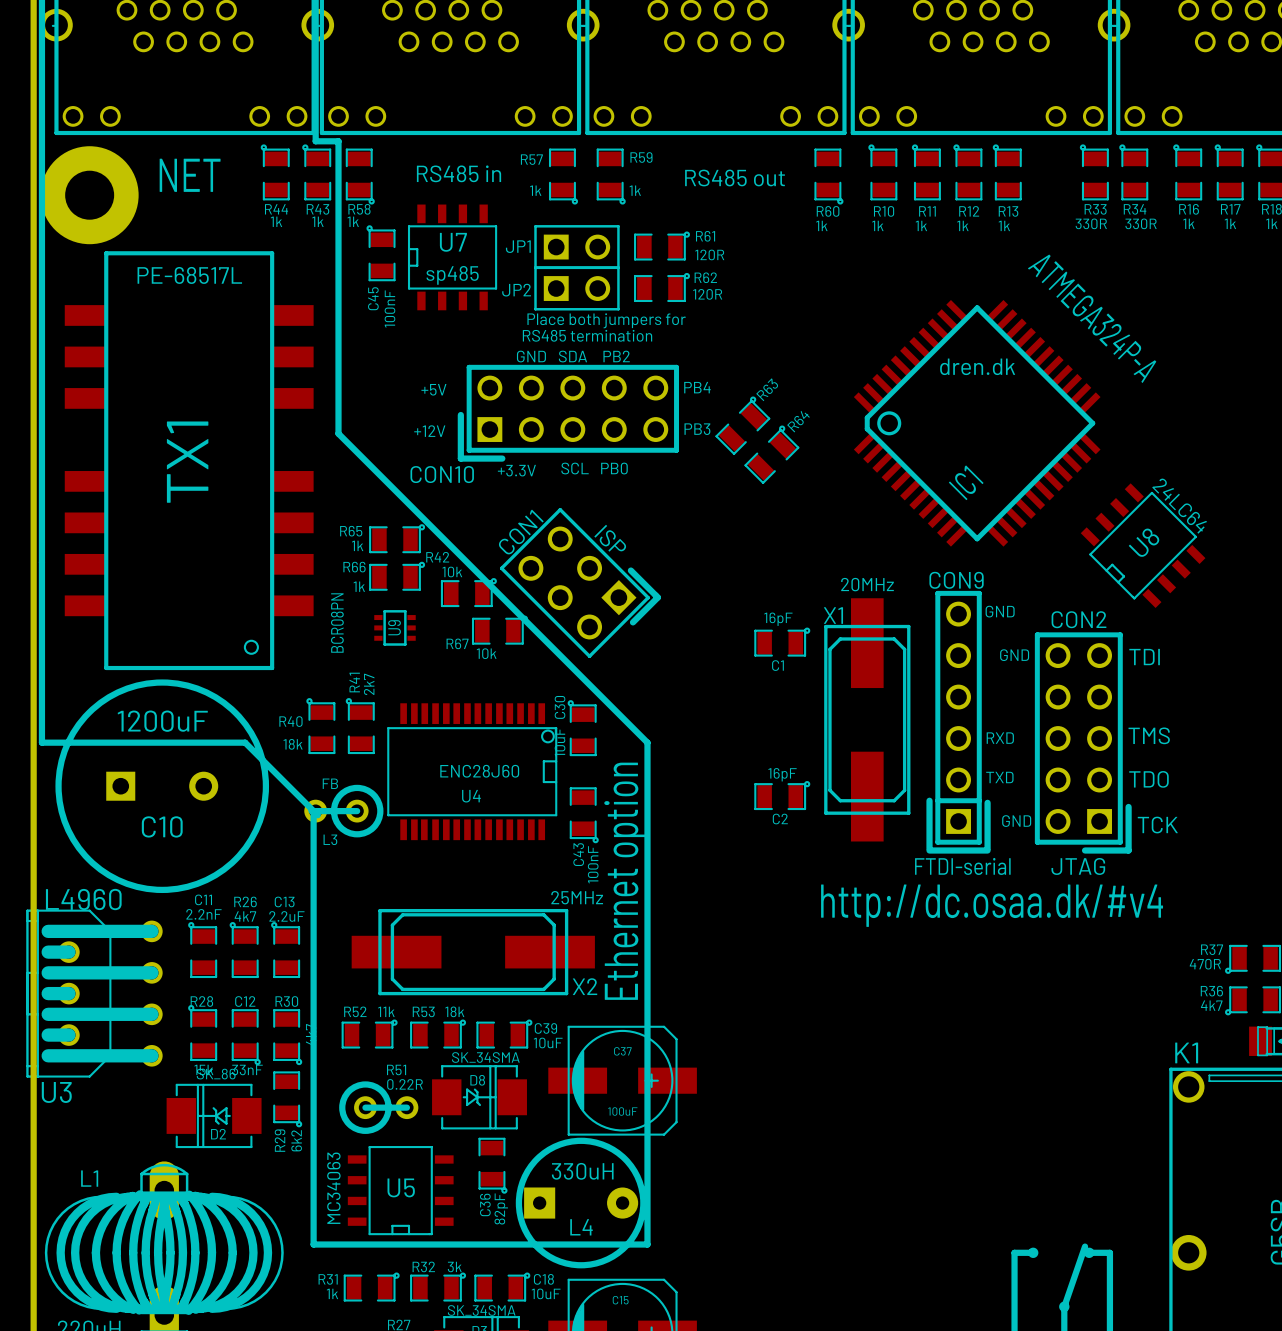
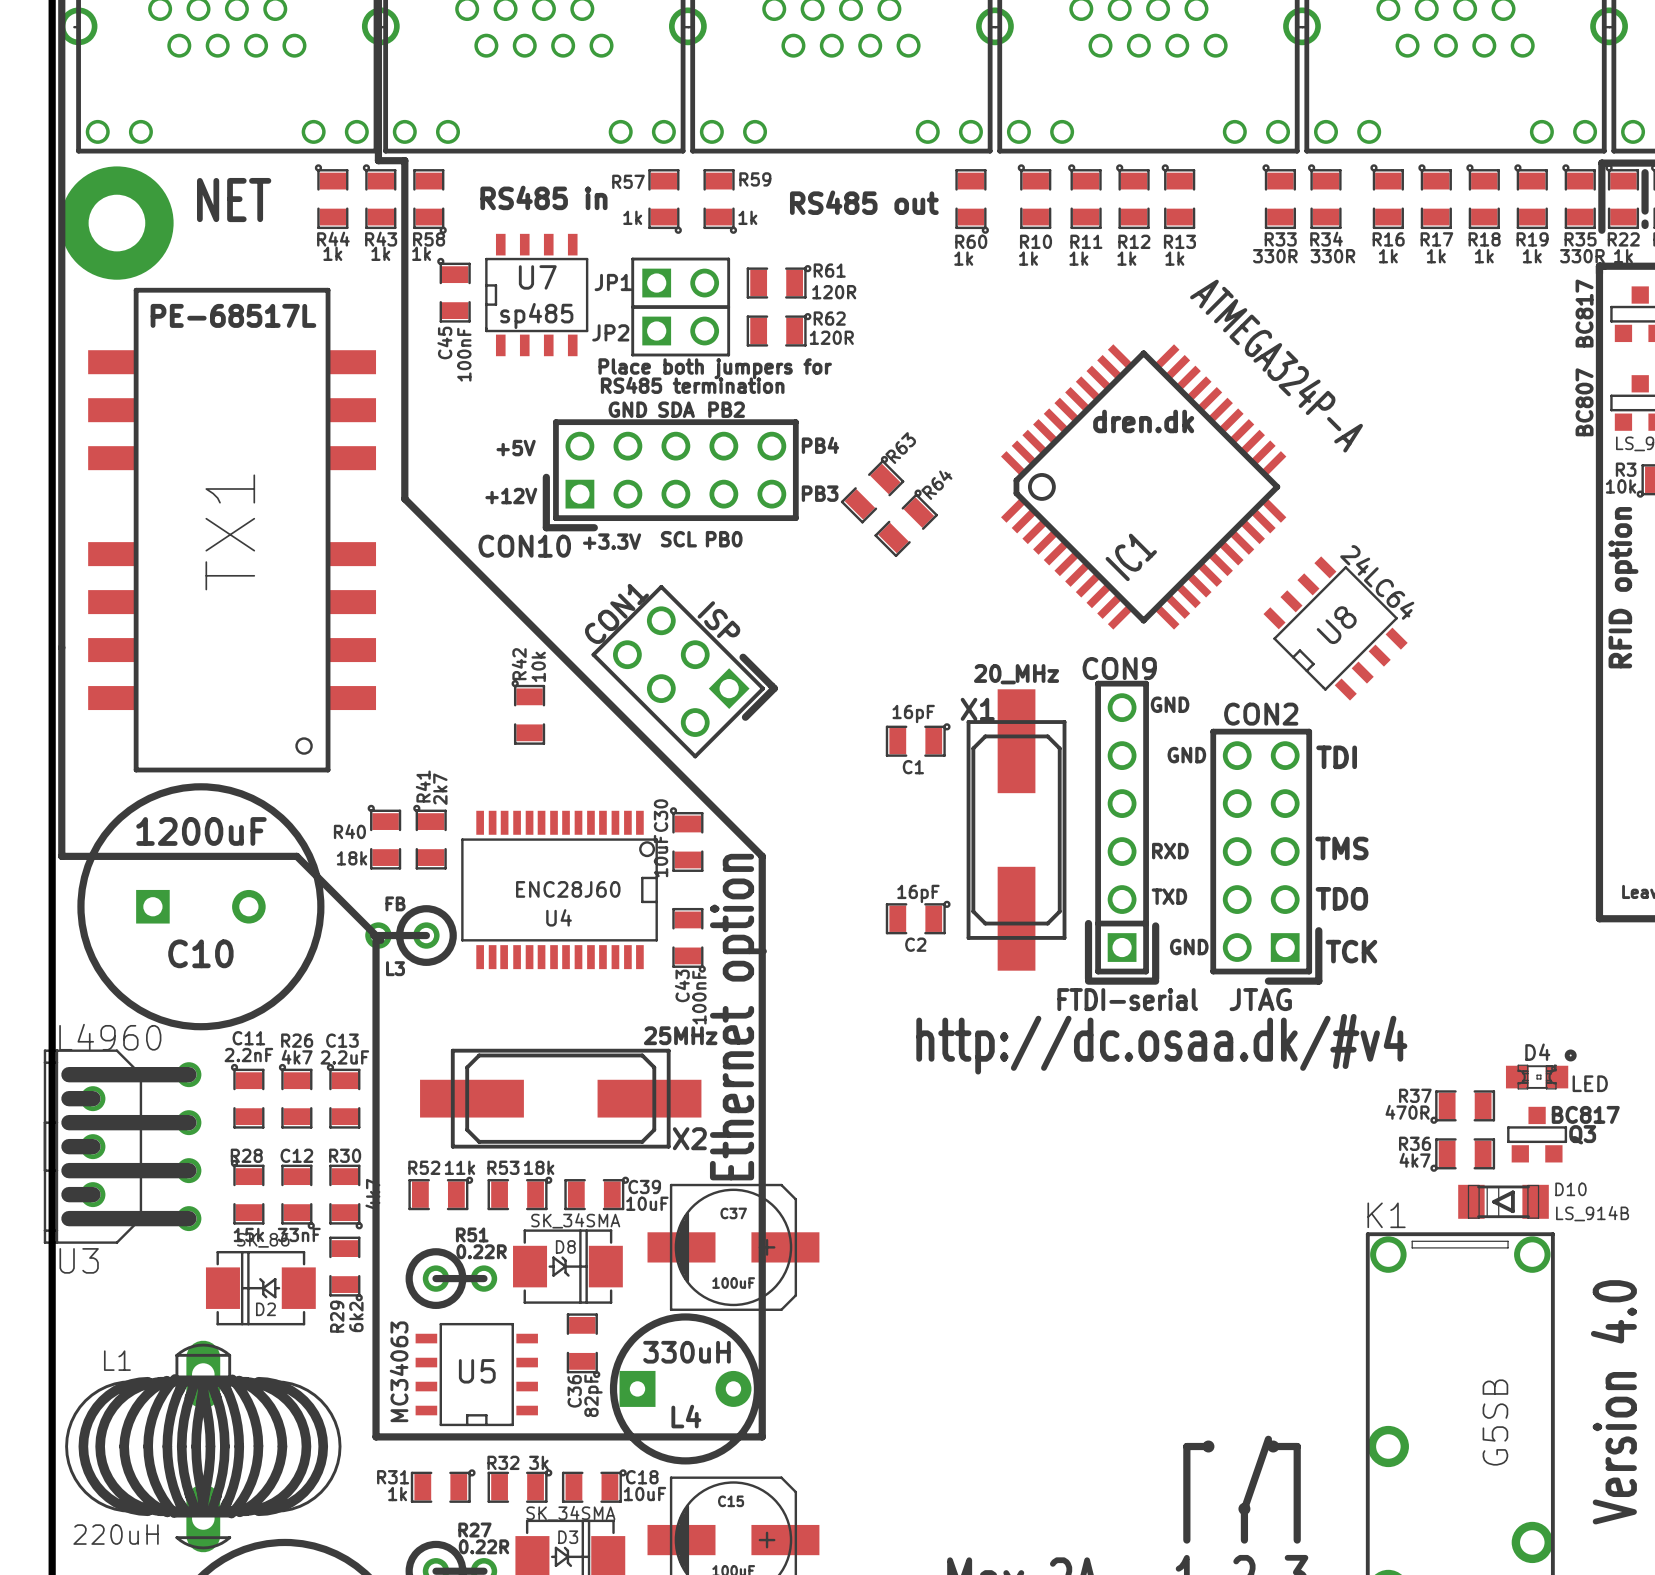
R65: 1k (397, 538) -> none
R66: 1k (397, 576) -> none
X1 value: 20MHz (867, 584) -> 20_MHz (1016, 674)
R42 rotation: 0° (468, 592) -> 90° counterclockwise (528, 712)
R42 position: (468, 592) -> (528, 712)
U9: BCR08PN (394, 627) -> none
R67: 10k (499, 630) -> none

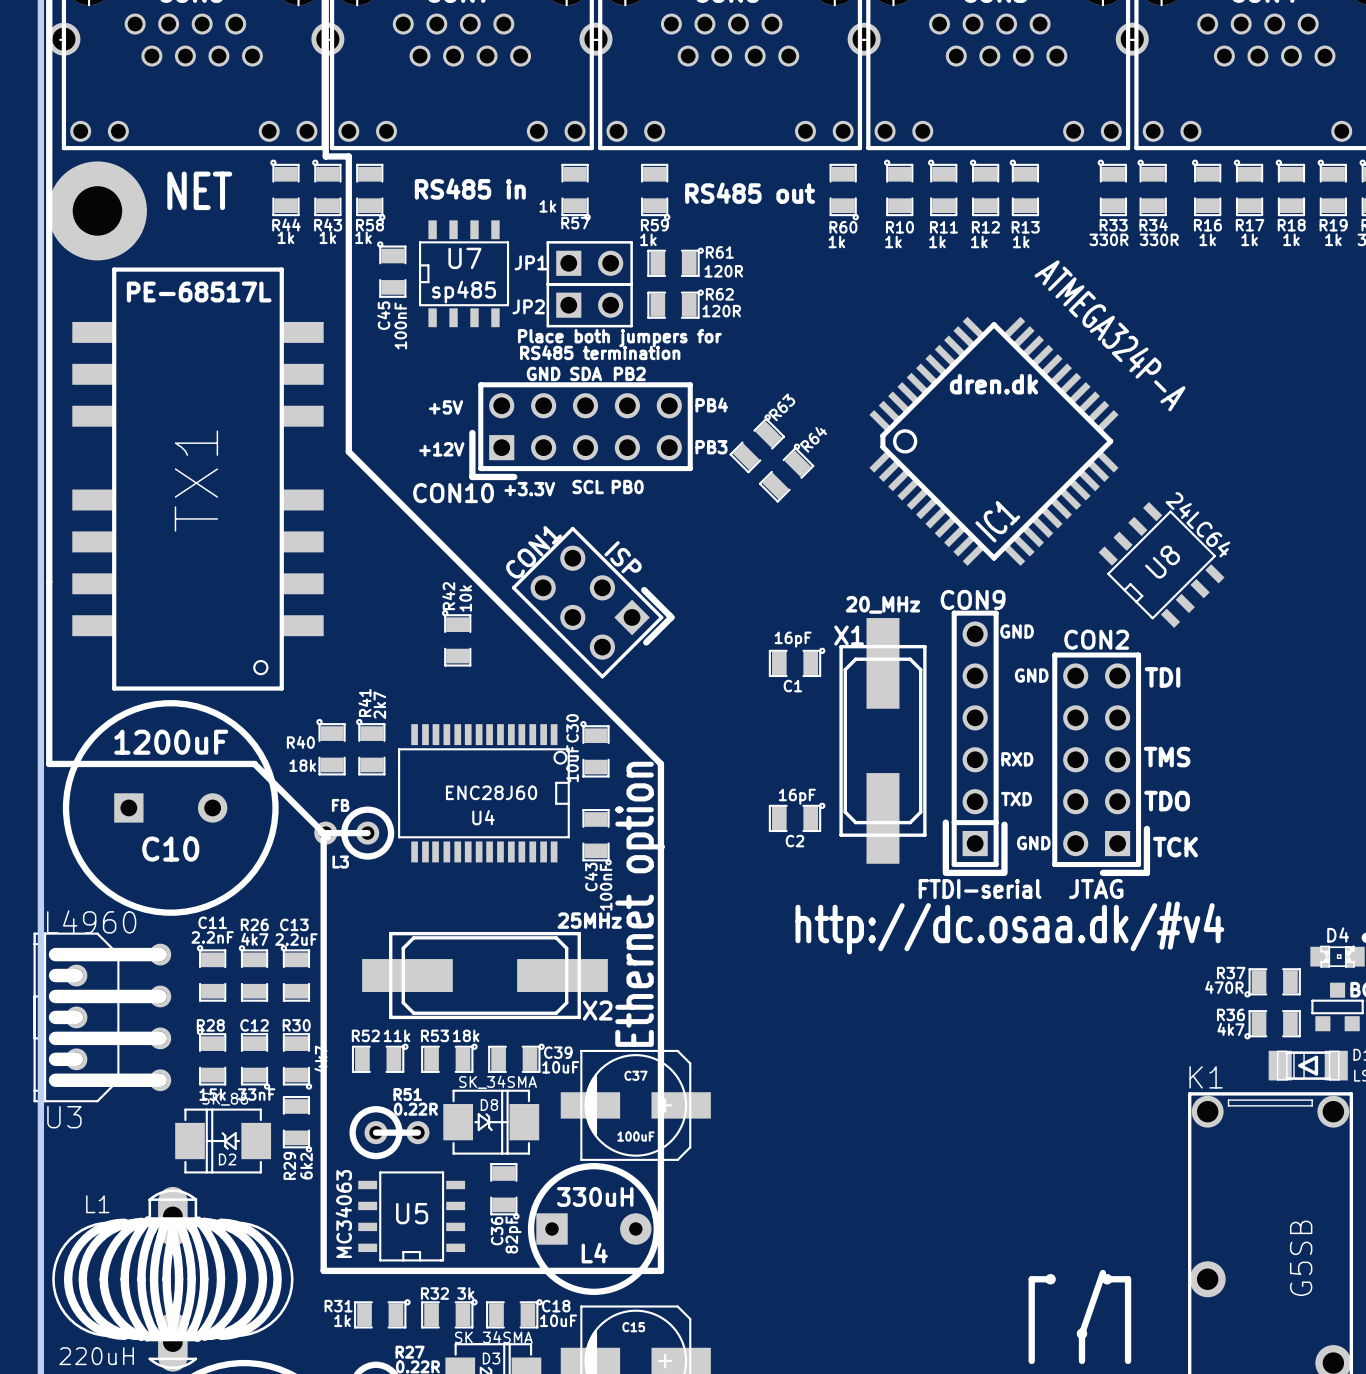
R59 name position: R59 (755, 179) -> R59 (654, 225)
R57 name position: R57 (628, 181) -> R57 (575, 223)
R59 position: (720, 201) -> (655, 192)
R59 value position: 1k (747, 217) -> 1k (648, 239)
IC1 name position: IC1 (1131, 557) -> IC1 (997, 521)

